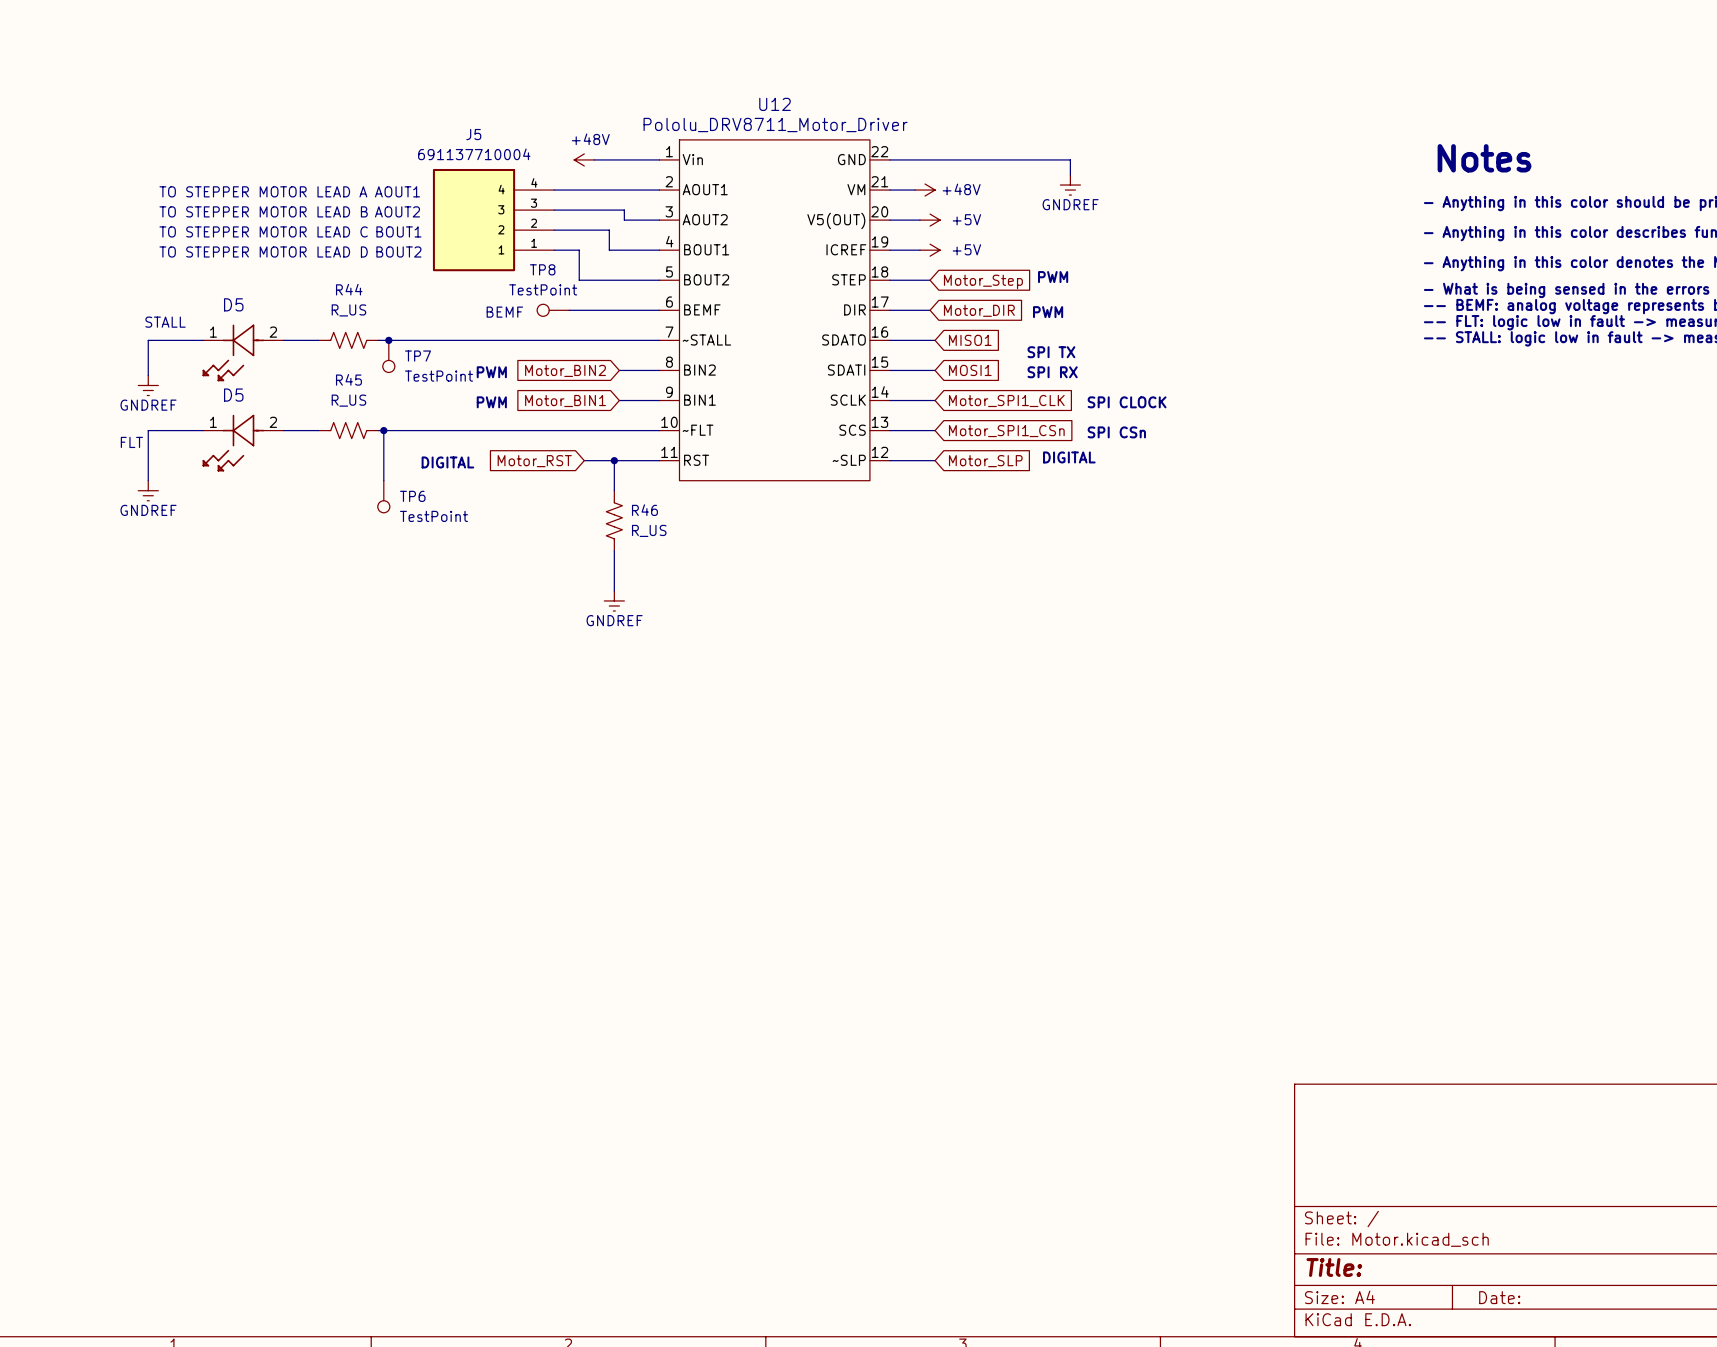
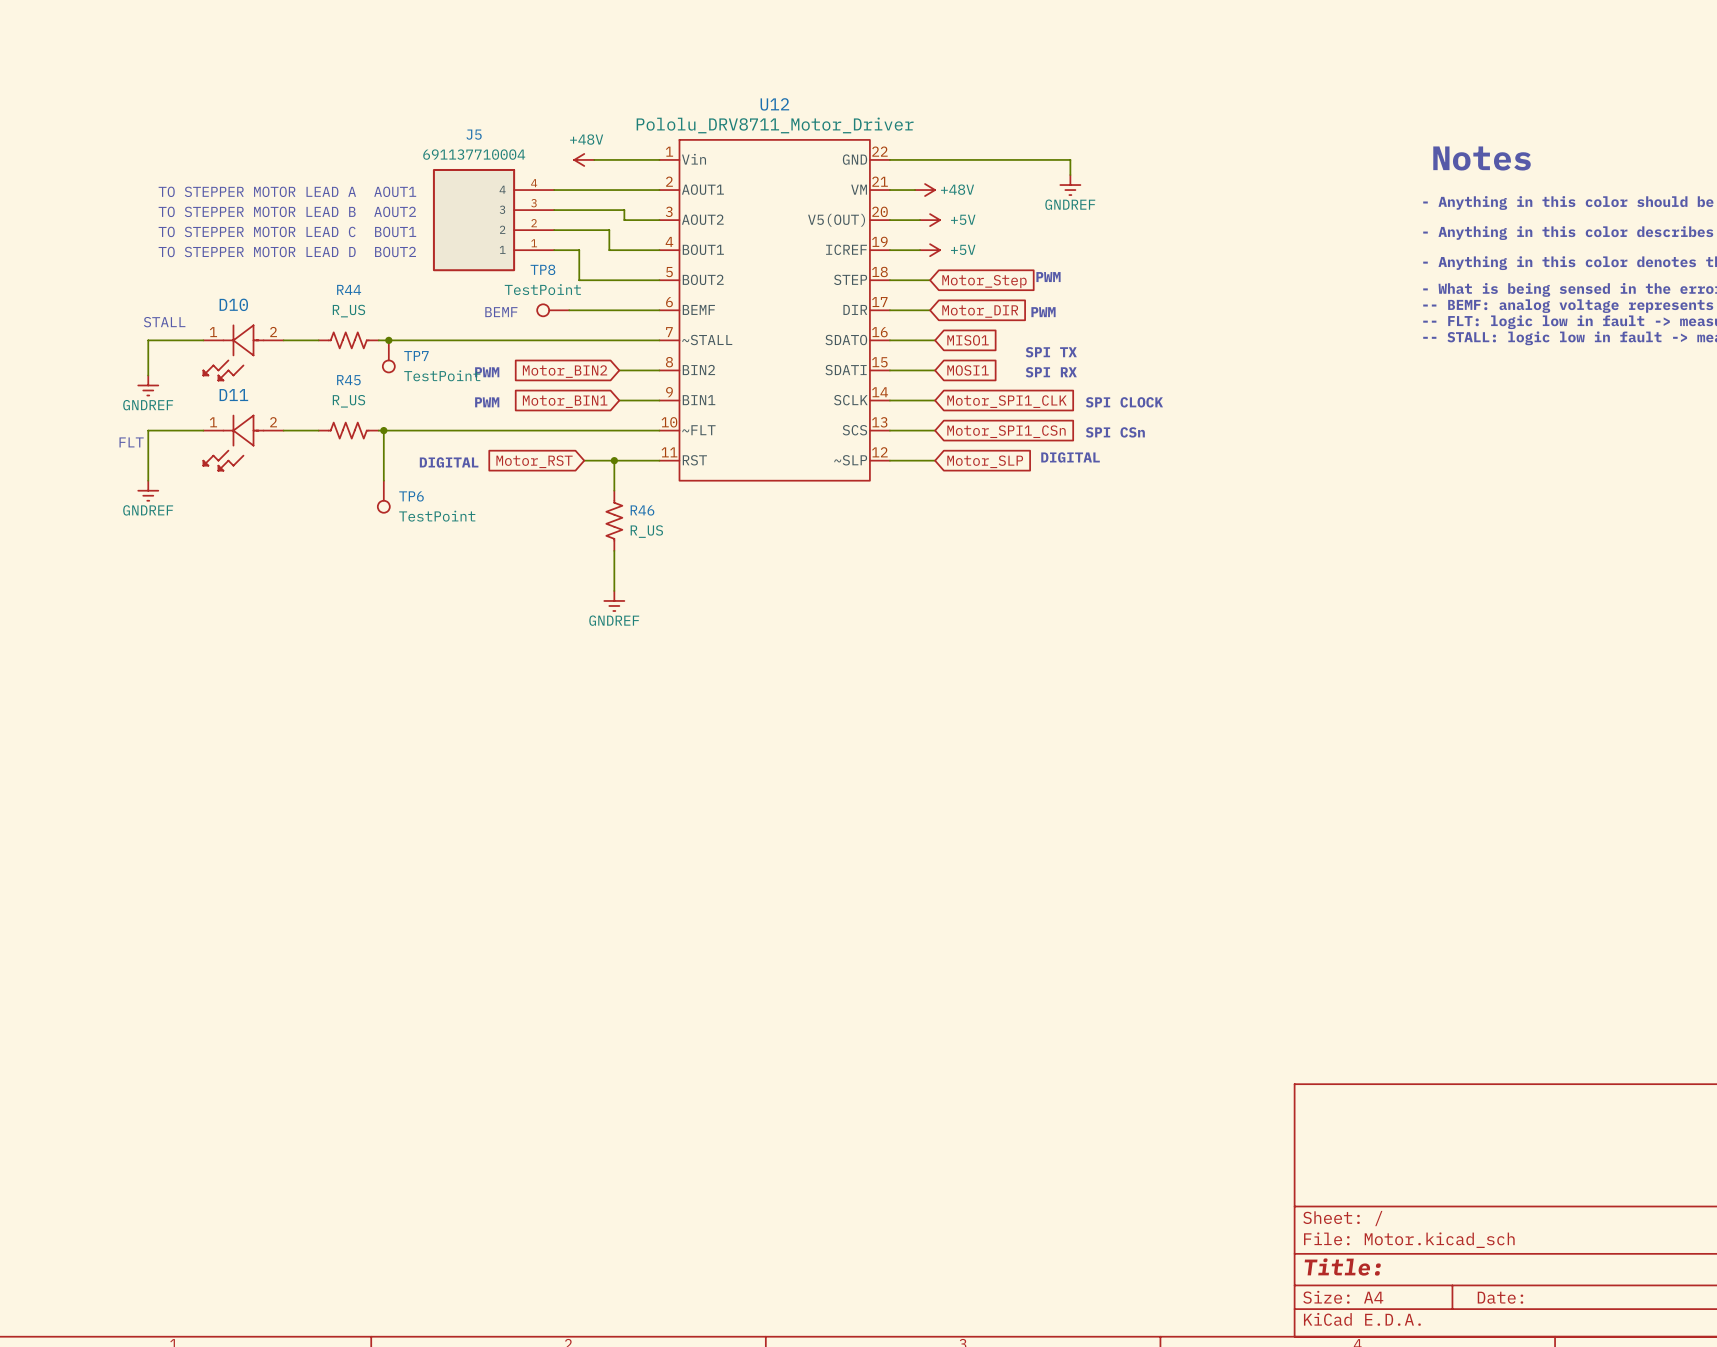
D5 name: D5 (233, 304) -> D10 (233, 304)
D5 name: D5 (233, 395) -> D11 (233, 395)

